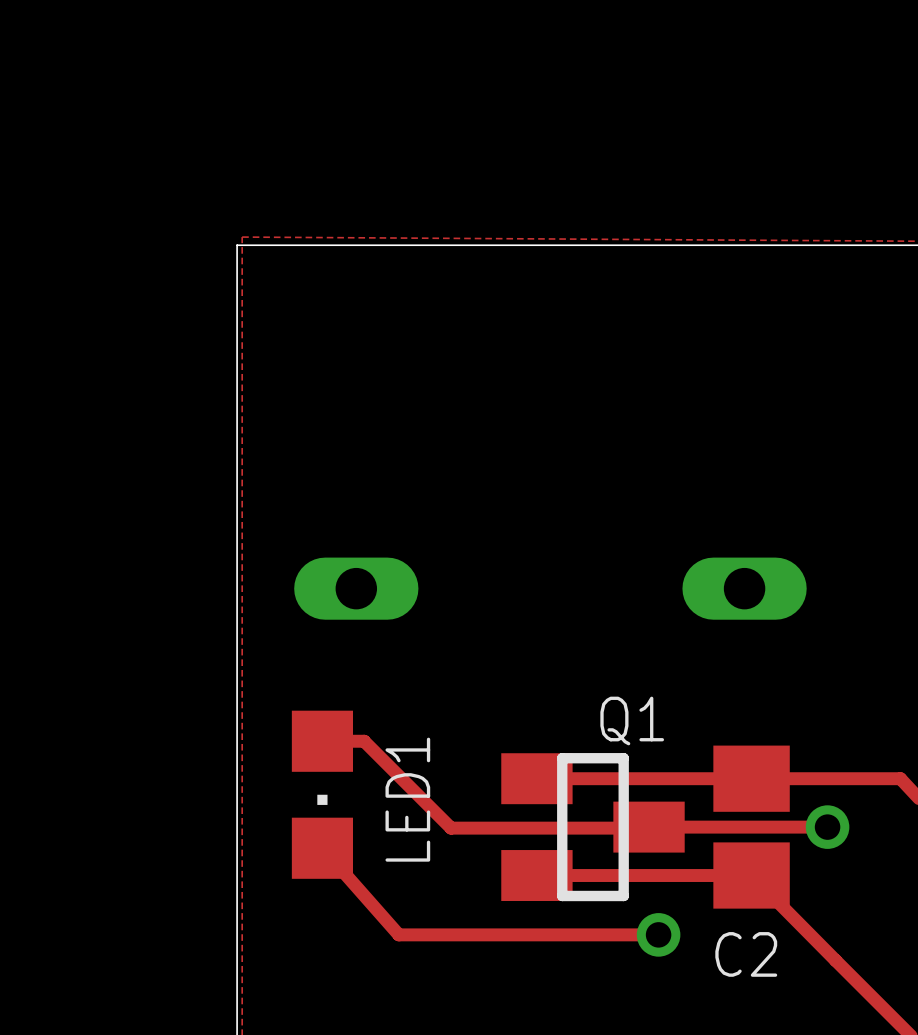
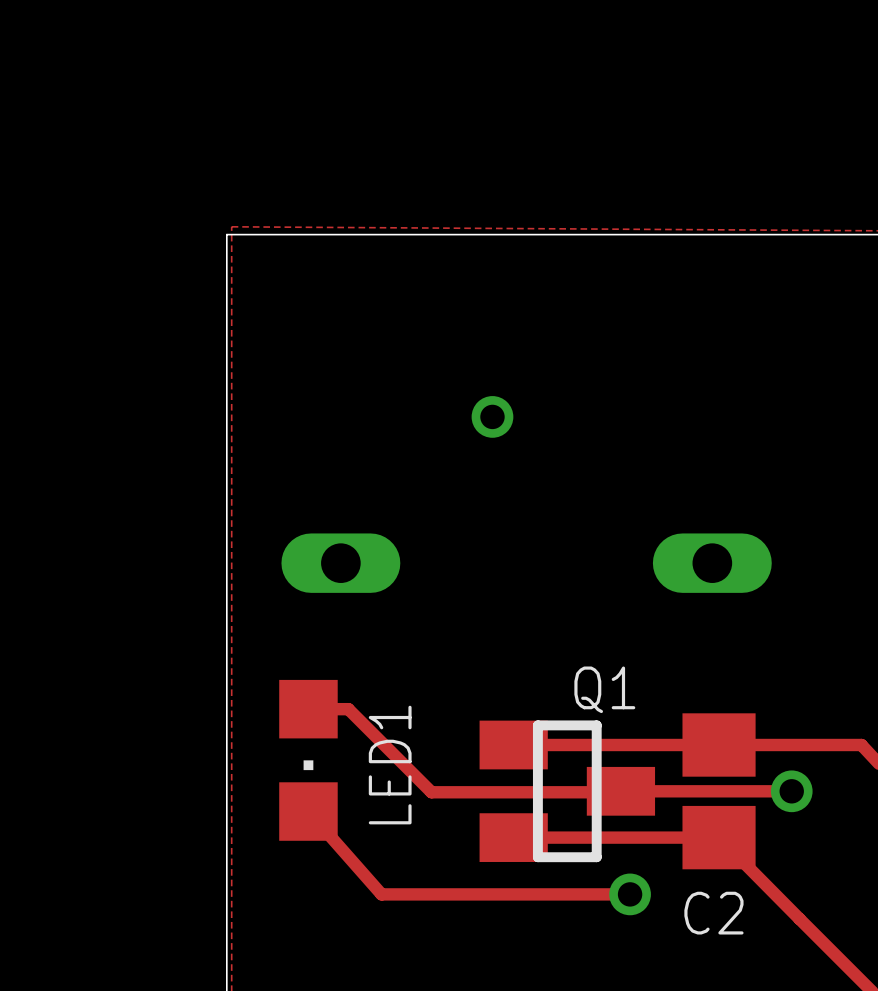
via: none -> (492, 416)

